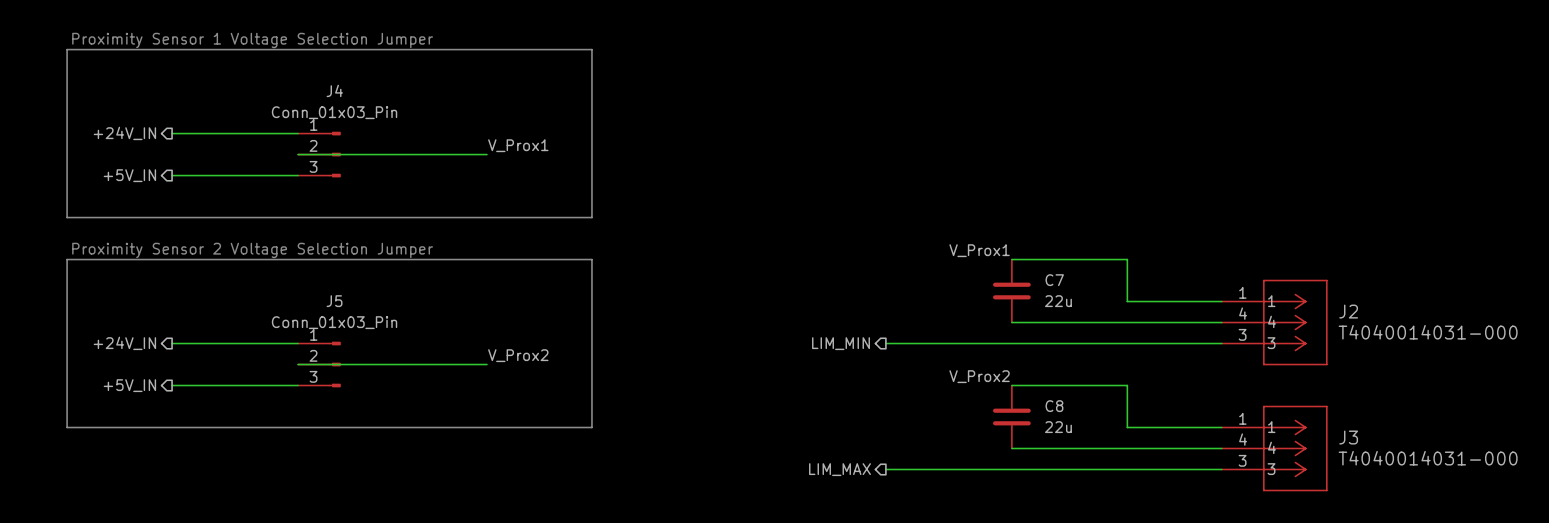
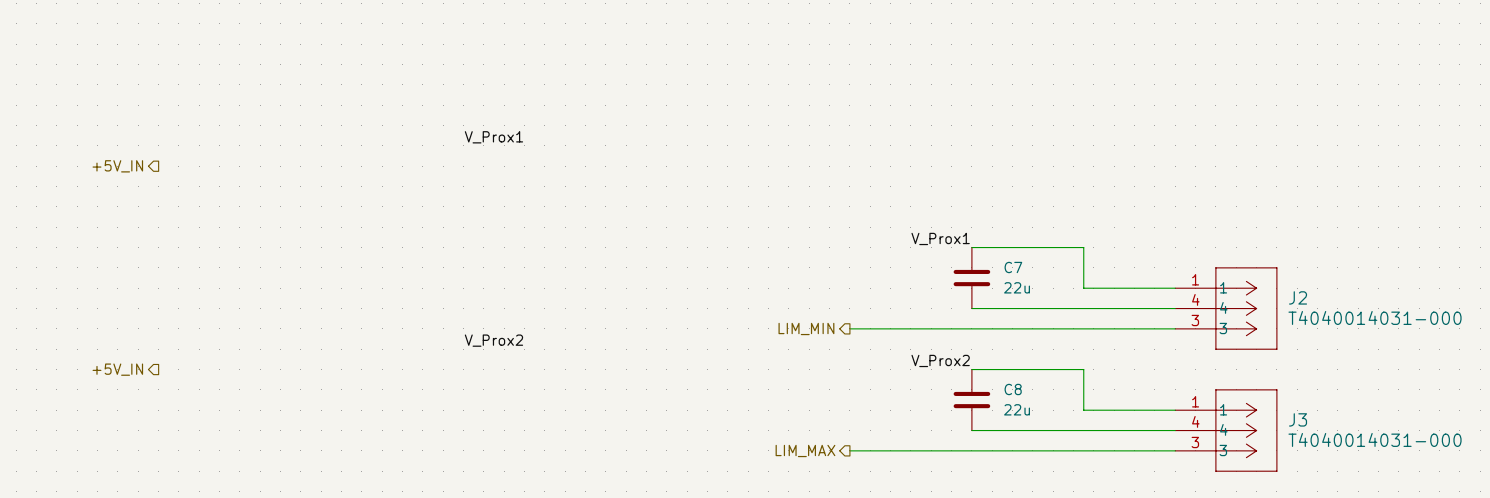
text: Proximity Sensor 1 Voltage Selection Jumper (252, 40) -> none
line: (67, 49) (67, 217) (591, 217) (591, 49) (67, 49) -> none
hierarchical label: +24V_IN (124, 133) -> none
wire: (172, 133) (298, 133) -> none
wire: (298, 154) (486, 154) -> none
J4: Conn_01x03_Pin (319, 154) -> none
wire: (172, 175) (298, 175) -> none
text: Proximity Sensor 2 Voltage Selection Jumper (252, 250) -> none
line: (67, 259) (591, 259) (591, 427) (67, 427) (67, 259) -> none
hierarchical label: +24V_IN (124, 343) -> none
wire: (172, 343) (298, 343) -> none
wire: (298, 364) (486, 364) -> none
J5: Conn_01x03_Pin (319, 364) -> none
wire: (172, 385) (298, 385) -> none

